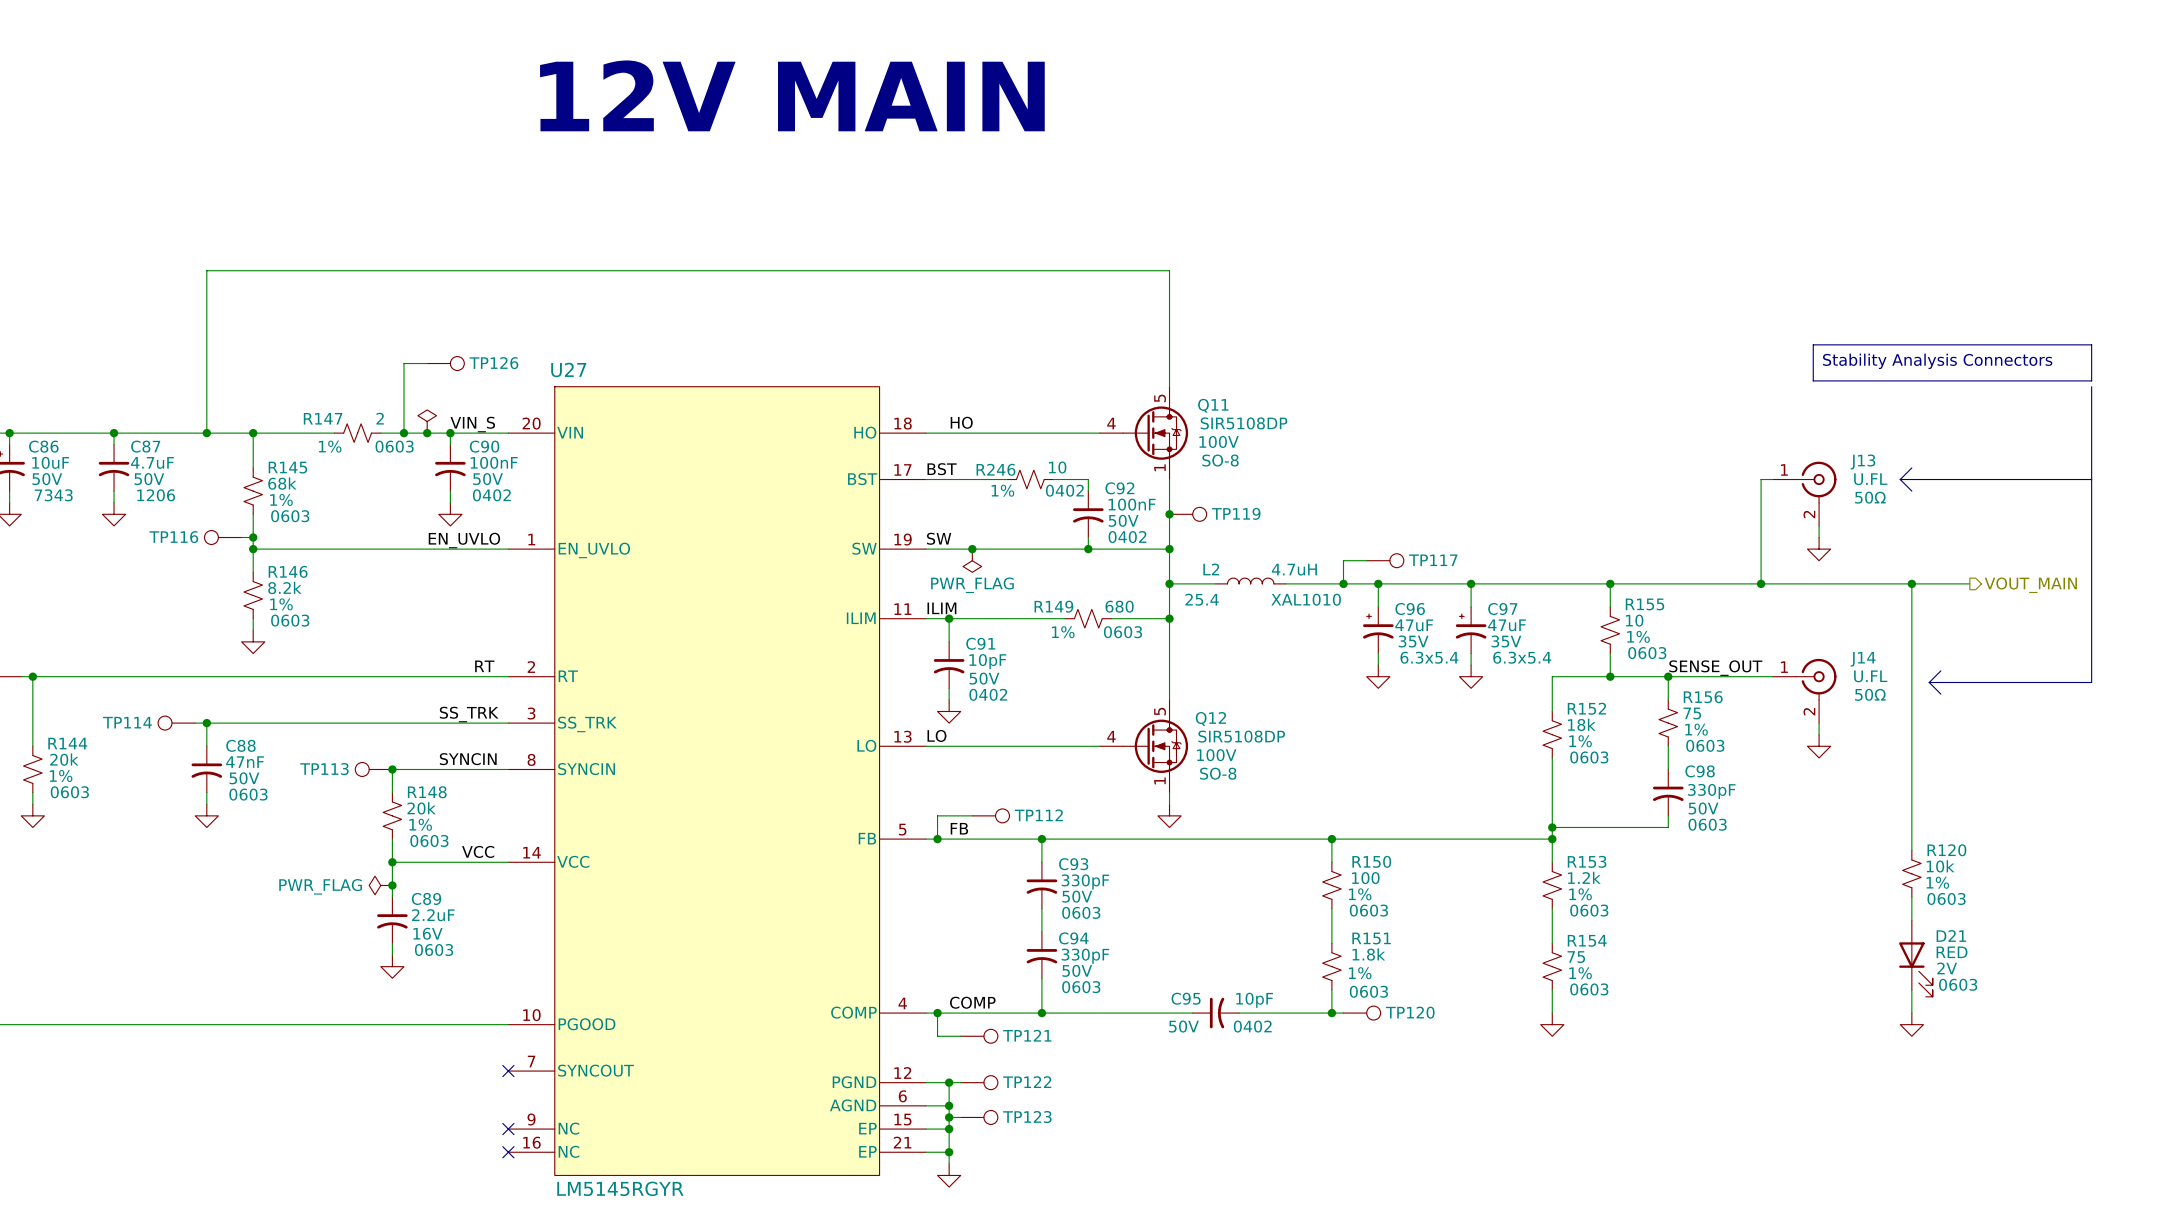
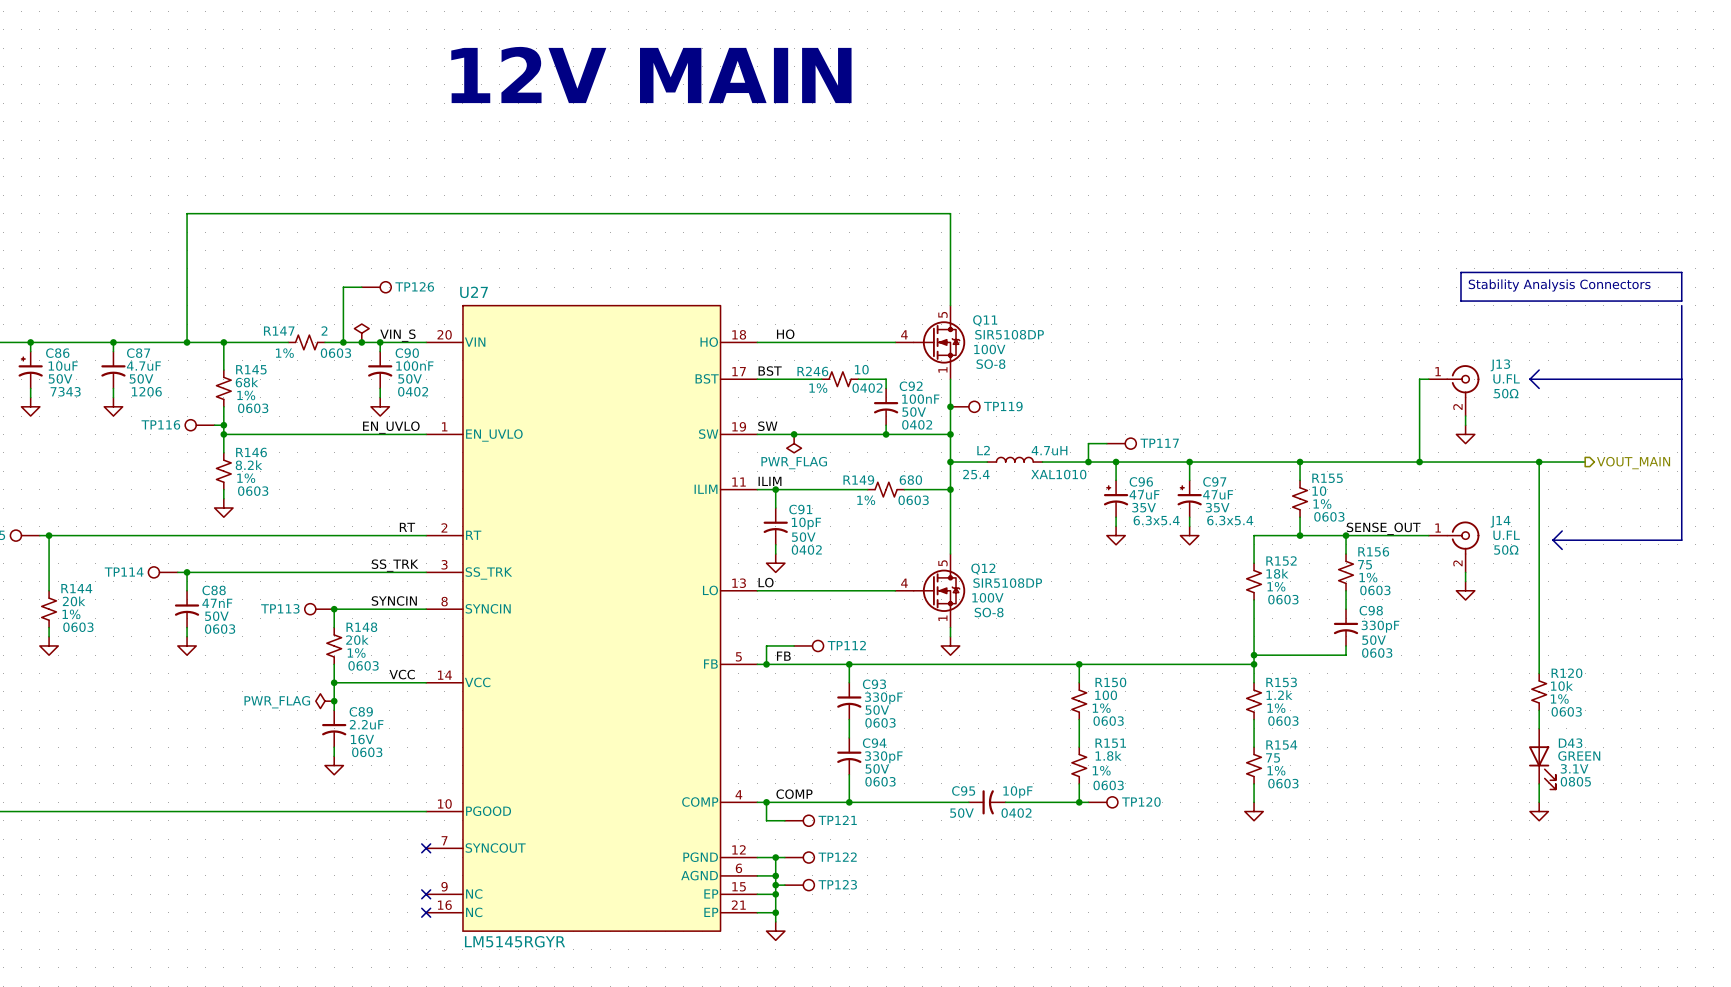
D21 name: D21 (1951, 935) -> D43 (1570, 743)
D21 value: RED (1952, 952) -> GREEN (1579, 756)
D21 text: 2V (1947, 968) -> 3.1V (1574, 768)
D21 text: 0603 (1958, 984) -> 0805 (1575, 781)

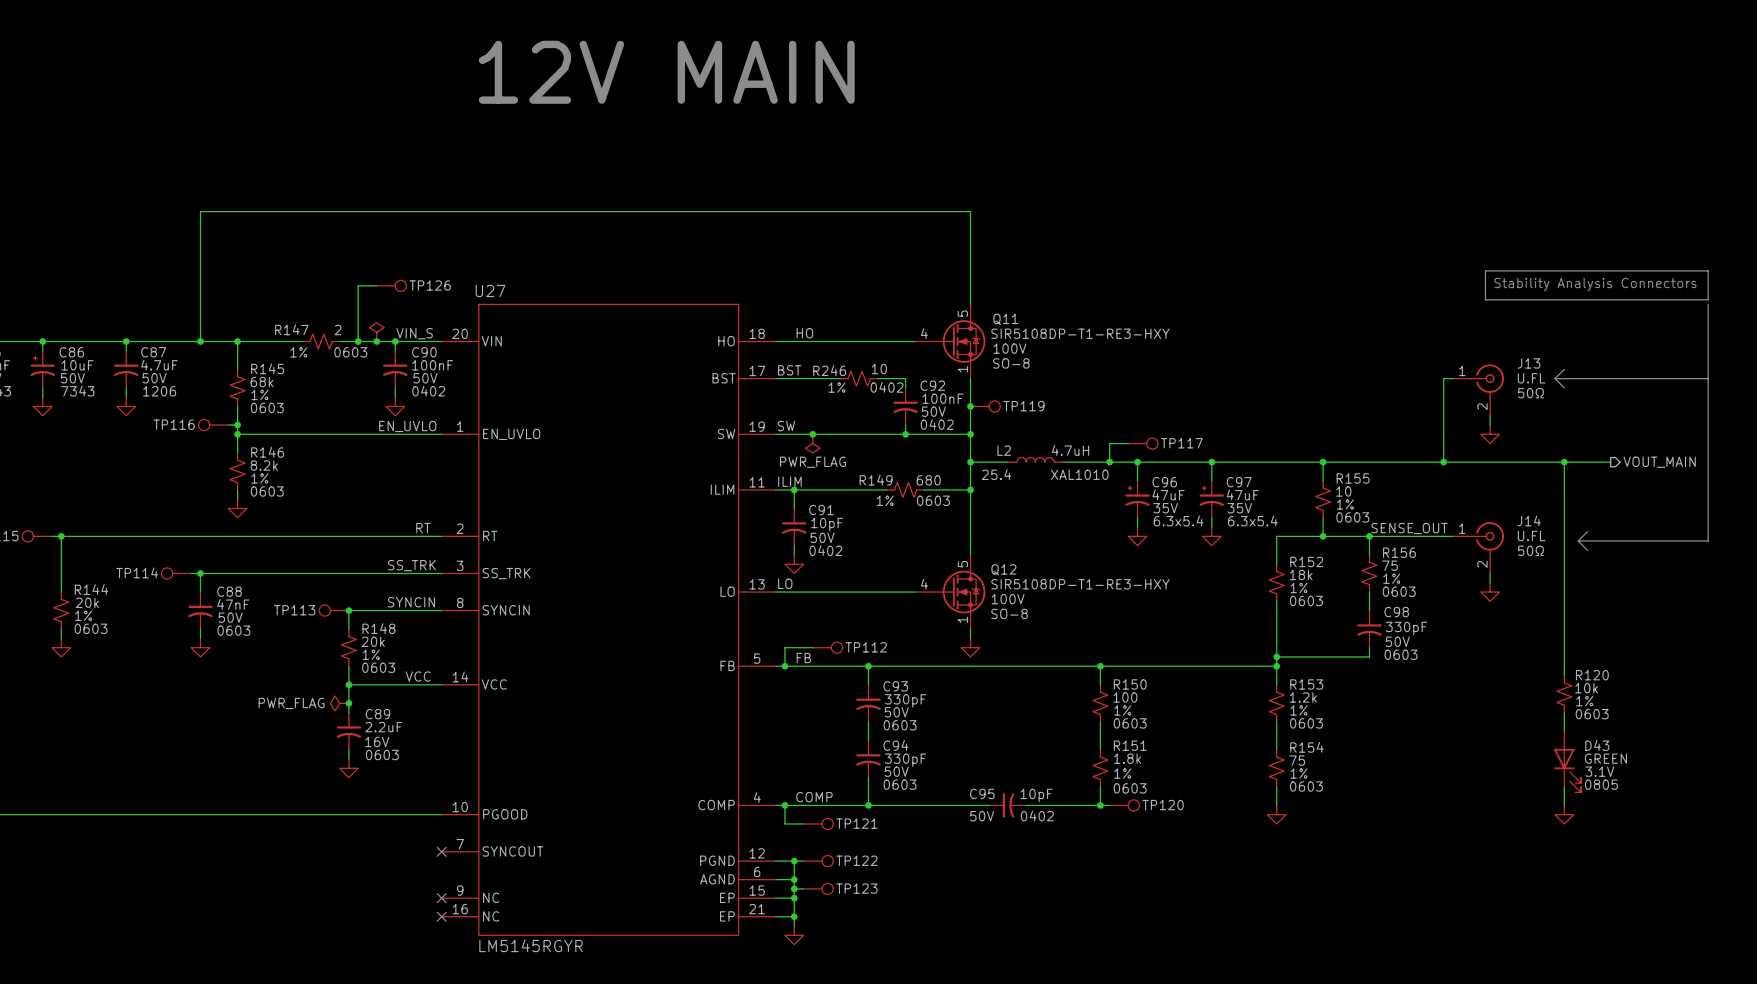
Q11 value: SIR5108DP (1009, 334) -> SIR5108DP-T1-RE3-HXY (1080, 333)
Q12 value: SIR5108DP (1007, 583) -> SIR5108DP-T1-RE3-HXY (1080, 584)

